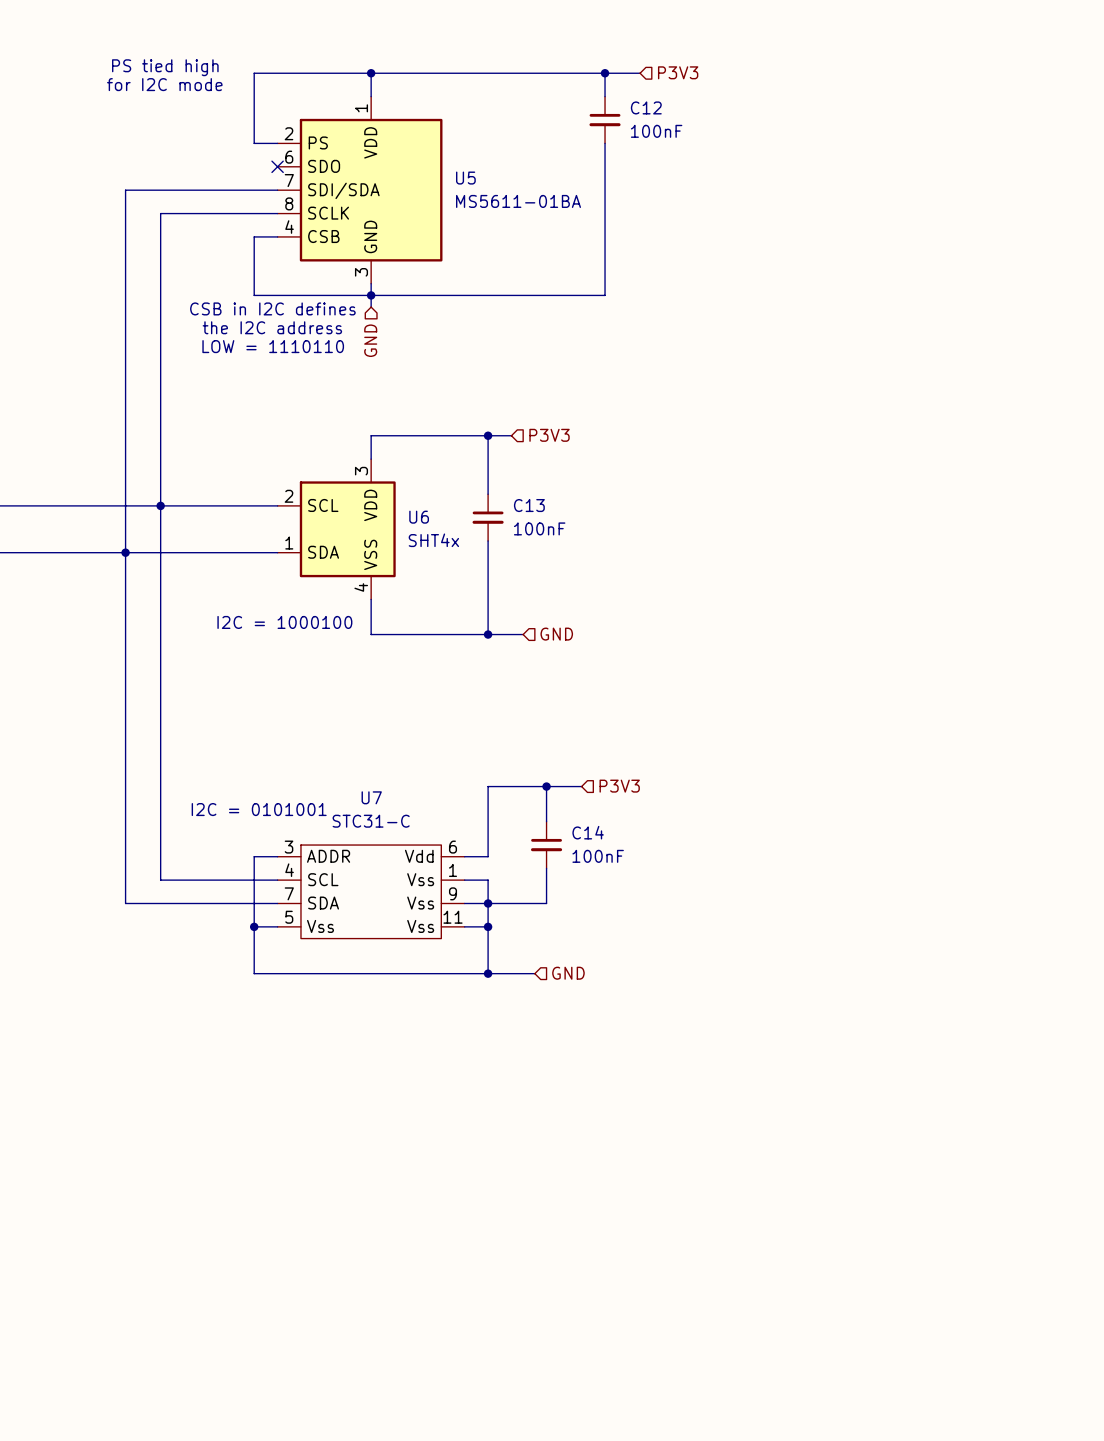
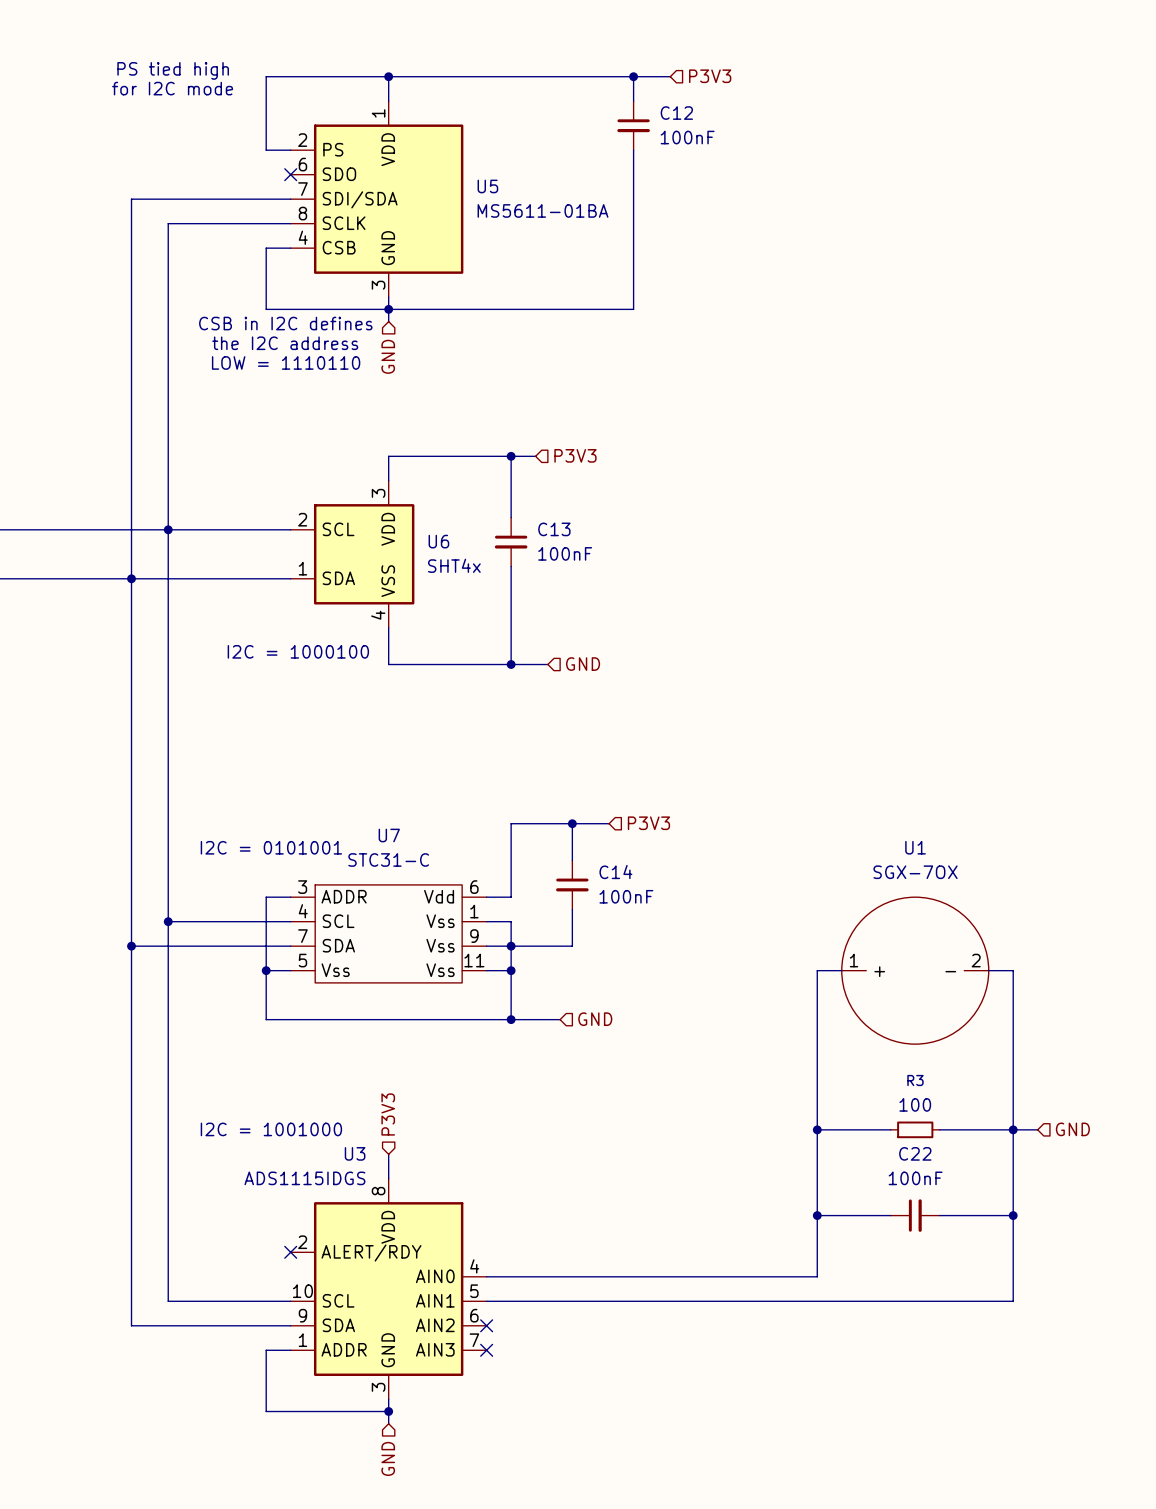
wire: none -> (168, 921) (168, 1301) (290, 1301)
junction: none -> (168, 921)
wire: none -> (131, 946) (131, 1325) (290, 1325)
junction: none -> (131, 946)
wire: none -> (841, 970) (817, 970) (817, 1276) (486, 1276)
U1: none -> SGX-7OX (915, 970)
wire: none -> (988, 970) (1013, 970) (1013, 1301) (486, 1301)
hierarchical label: none -> P3V3 (388, 1114)
text: none -> I2C = 1001000 (271, 1129)
wire: none -> (817, 1129) (890, 1129)
junction: none -> (817, 1129)
R3: none -> 100 (915, 1129)
wire: none -> (939, 1129) (1037, 1129)
junction: none -> (1013, 1129)
hierarchical label: none -> GND (1072, 1129)
wire: none -> (388, 1154) (388, 1178)
wire: none -> (817, 1215) (890, 1215)
junction: none -> (817, 1215)
C22: none -> 100nF (915, 1215)
wire: none -> (939, 1215) (1013, 1215)
junction: none -> (1013, 1215)
no-connect mark: none -> (290, 1252)
U3: none -> ADS1115IDGS (388, 1289)
no-connect mark: none -> (486, 1325)
wire: none -> (290, 1350) (266, 1350) (266, 1411) (388, 1411)
no-connect mark: none -> (486, 1350)
wire: none -> (388, 1399) (388, 1423)
junction: none -> (388, 1411)
hierarchical label: none -> GND (388, 1458)

